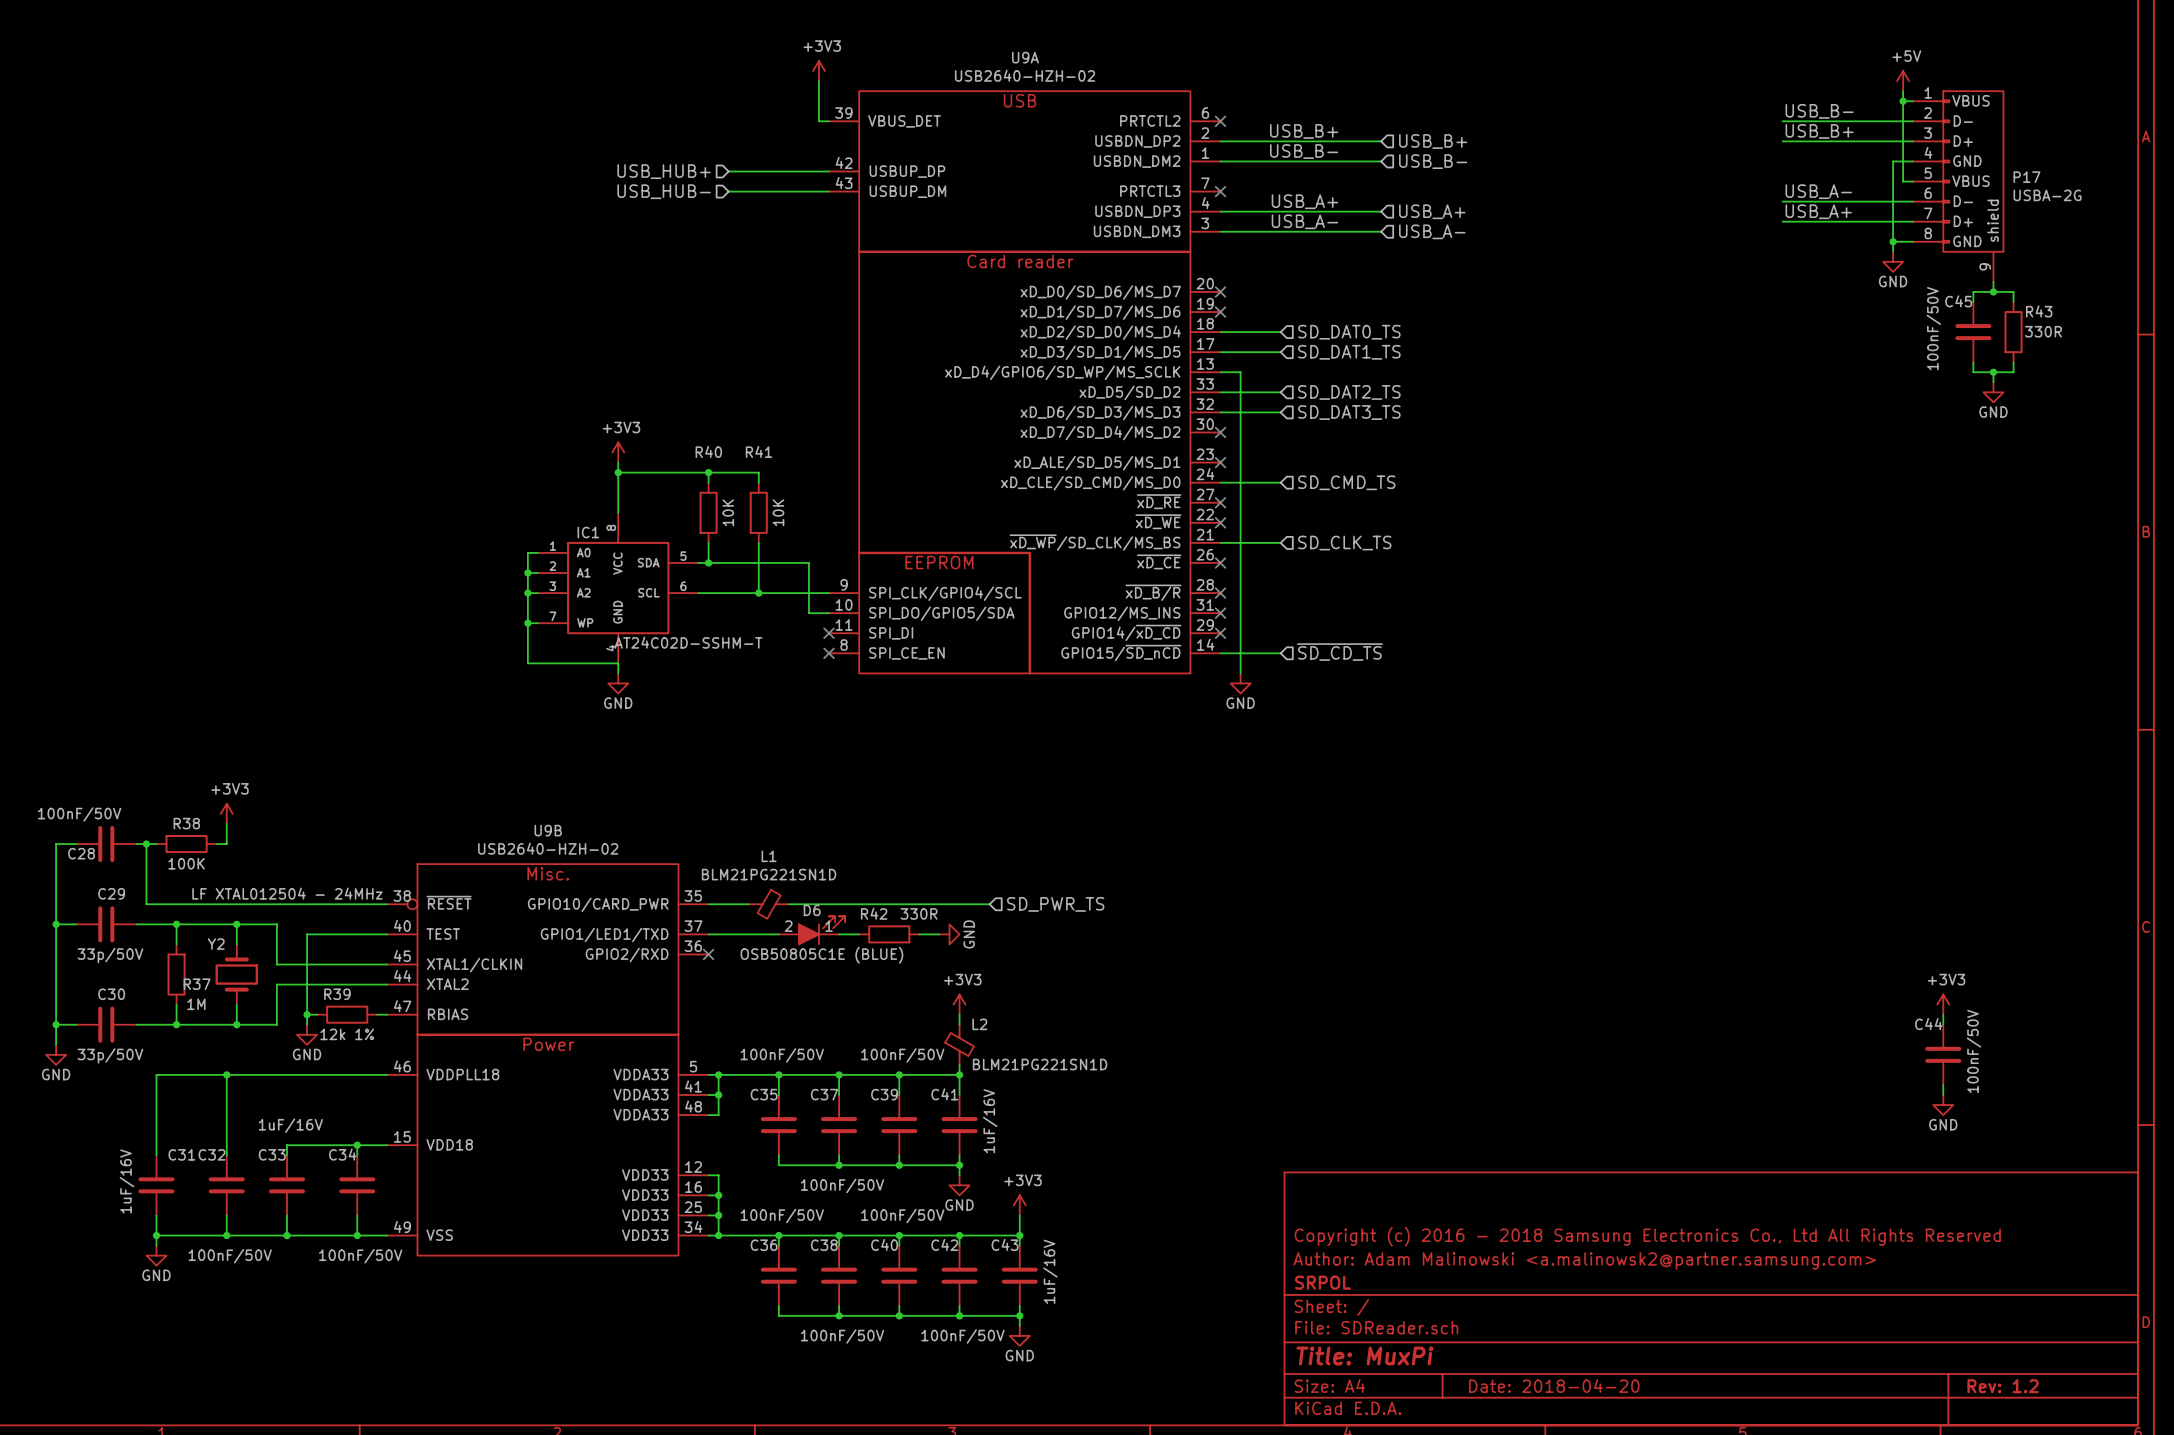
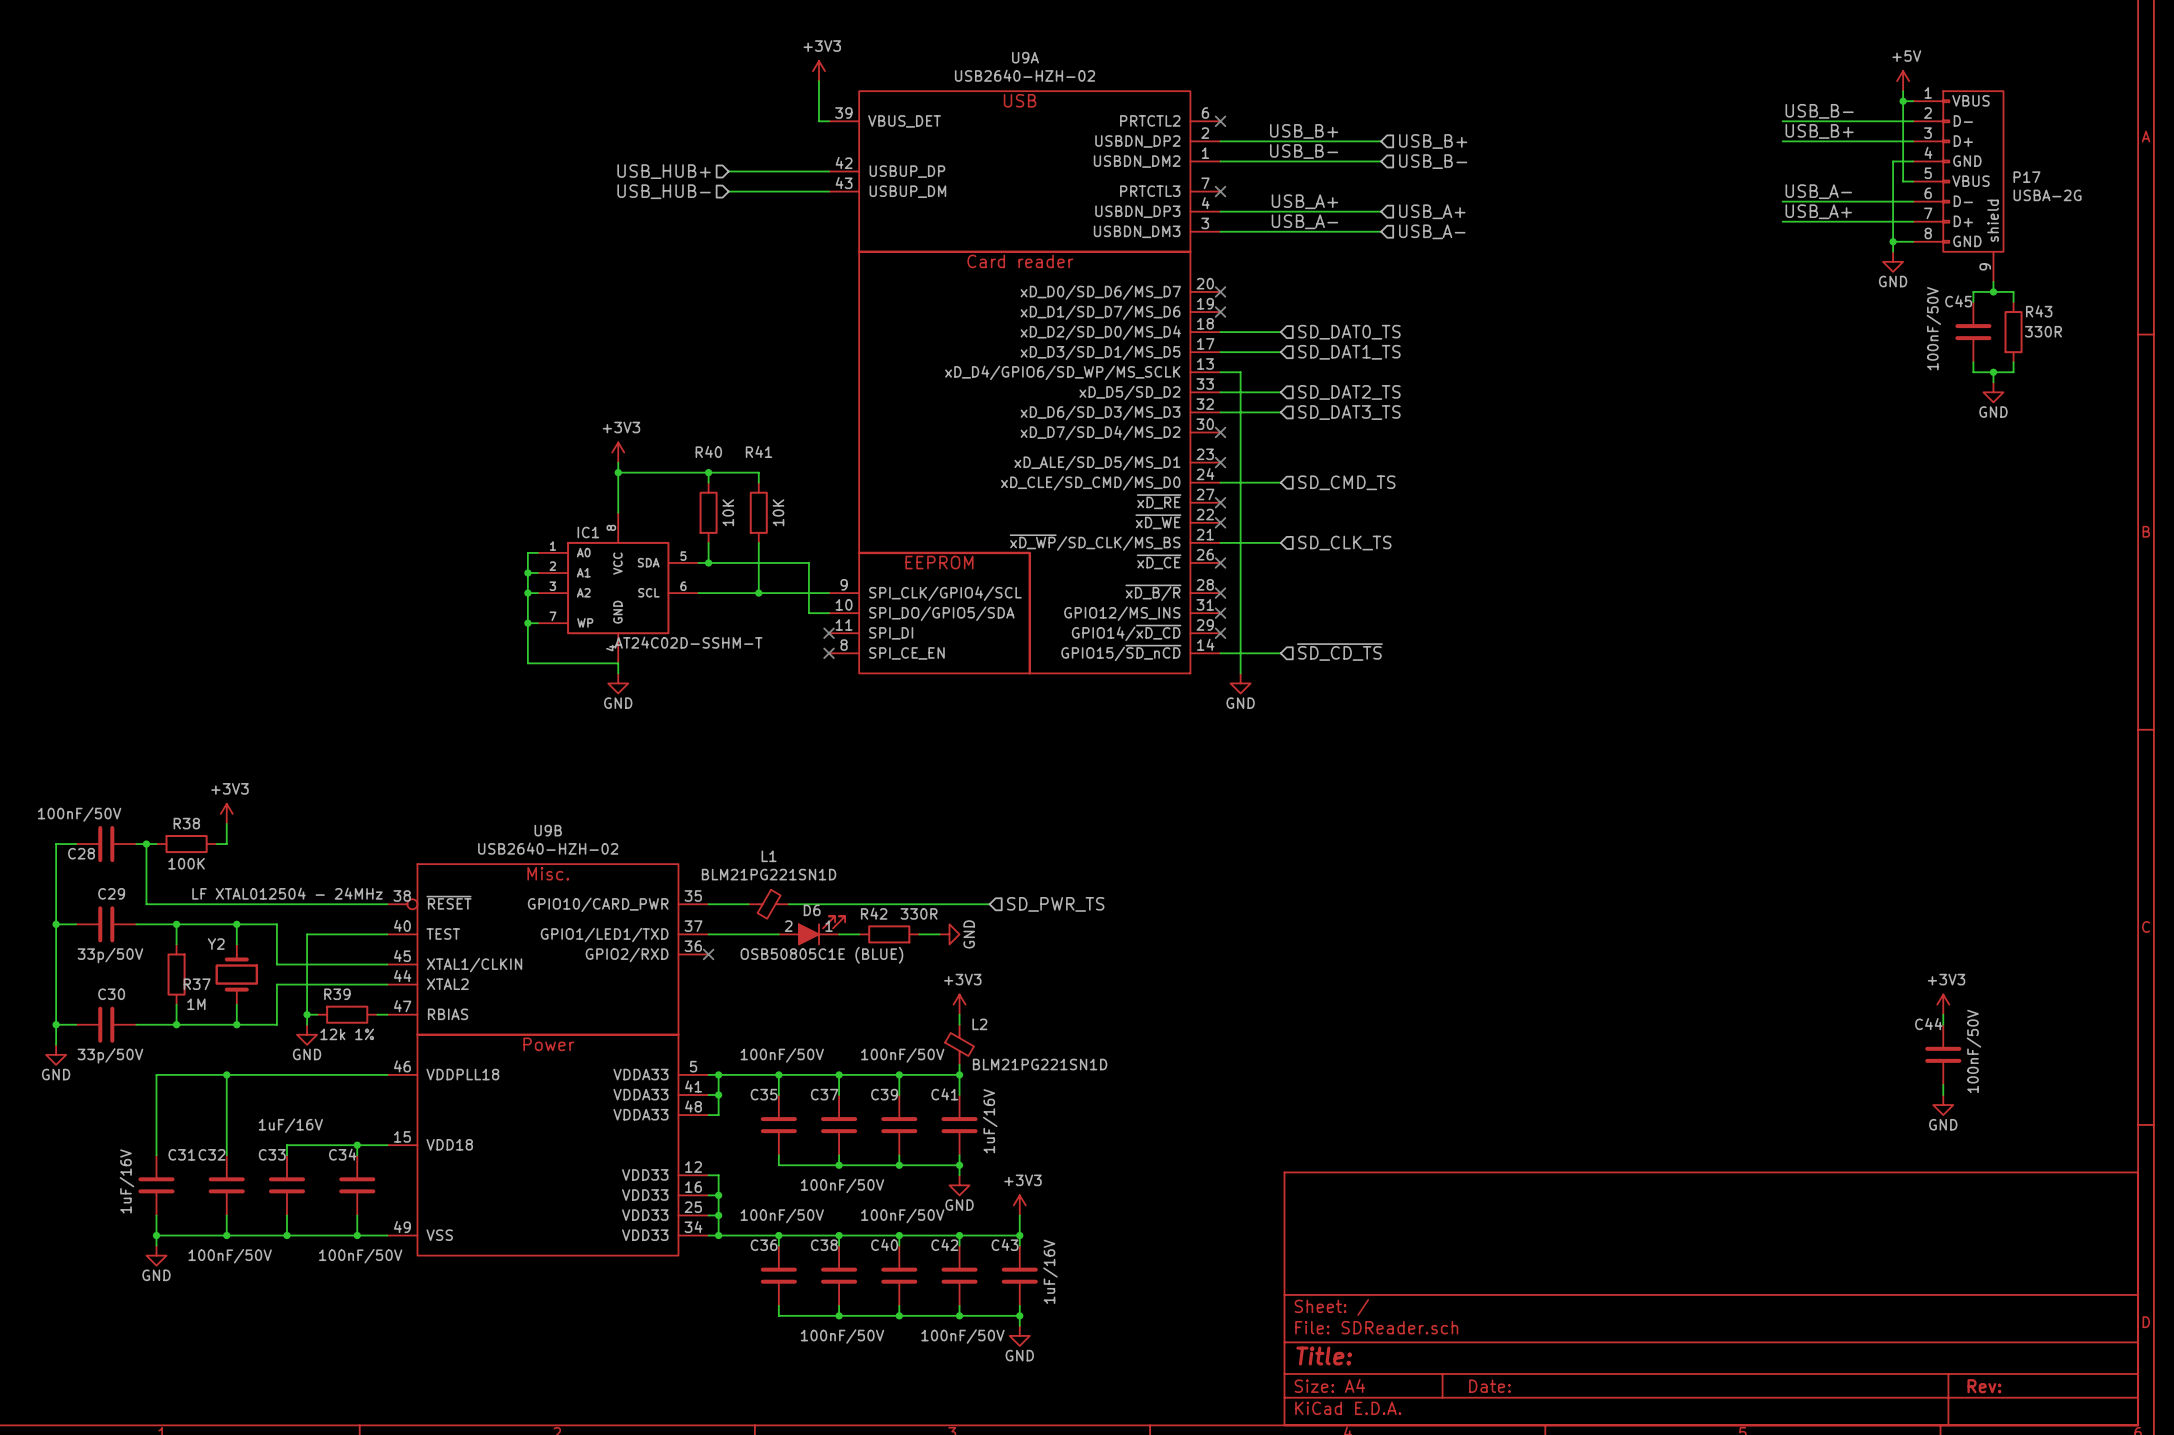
title block: Copyright (c) 2016 - 2018 Samsung Electronics Co., Ltd All Rights Reserved (1647, 1236) -> none
title block: Author: Adam Malinowski <a.malinowsk2@partner.samsung.com> (1584, 1260) -> none
title block: SRPOL (1323, 1282) -> none
title block: Title: MuxPi (1364, 1356) -> Title: (1324, 1356)
title block: Date: 2018-04-20 (1554, 1385) -> Date: (1489, 1386)
title block: Rev: 1.2 (2003, 1386) -> Rev: (1984, 1386)

